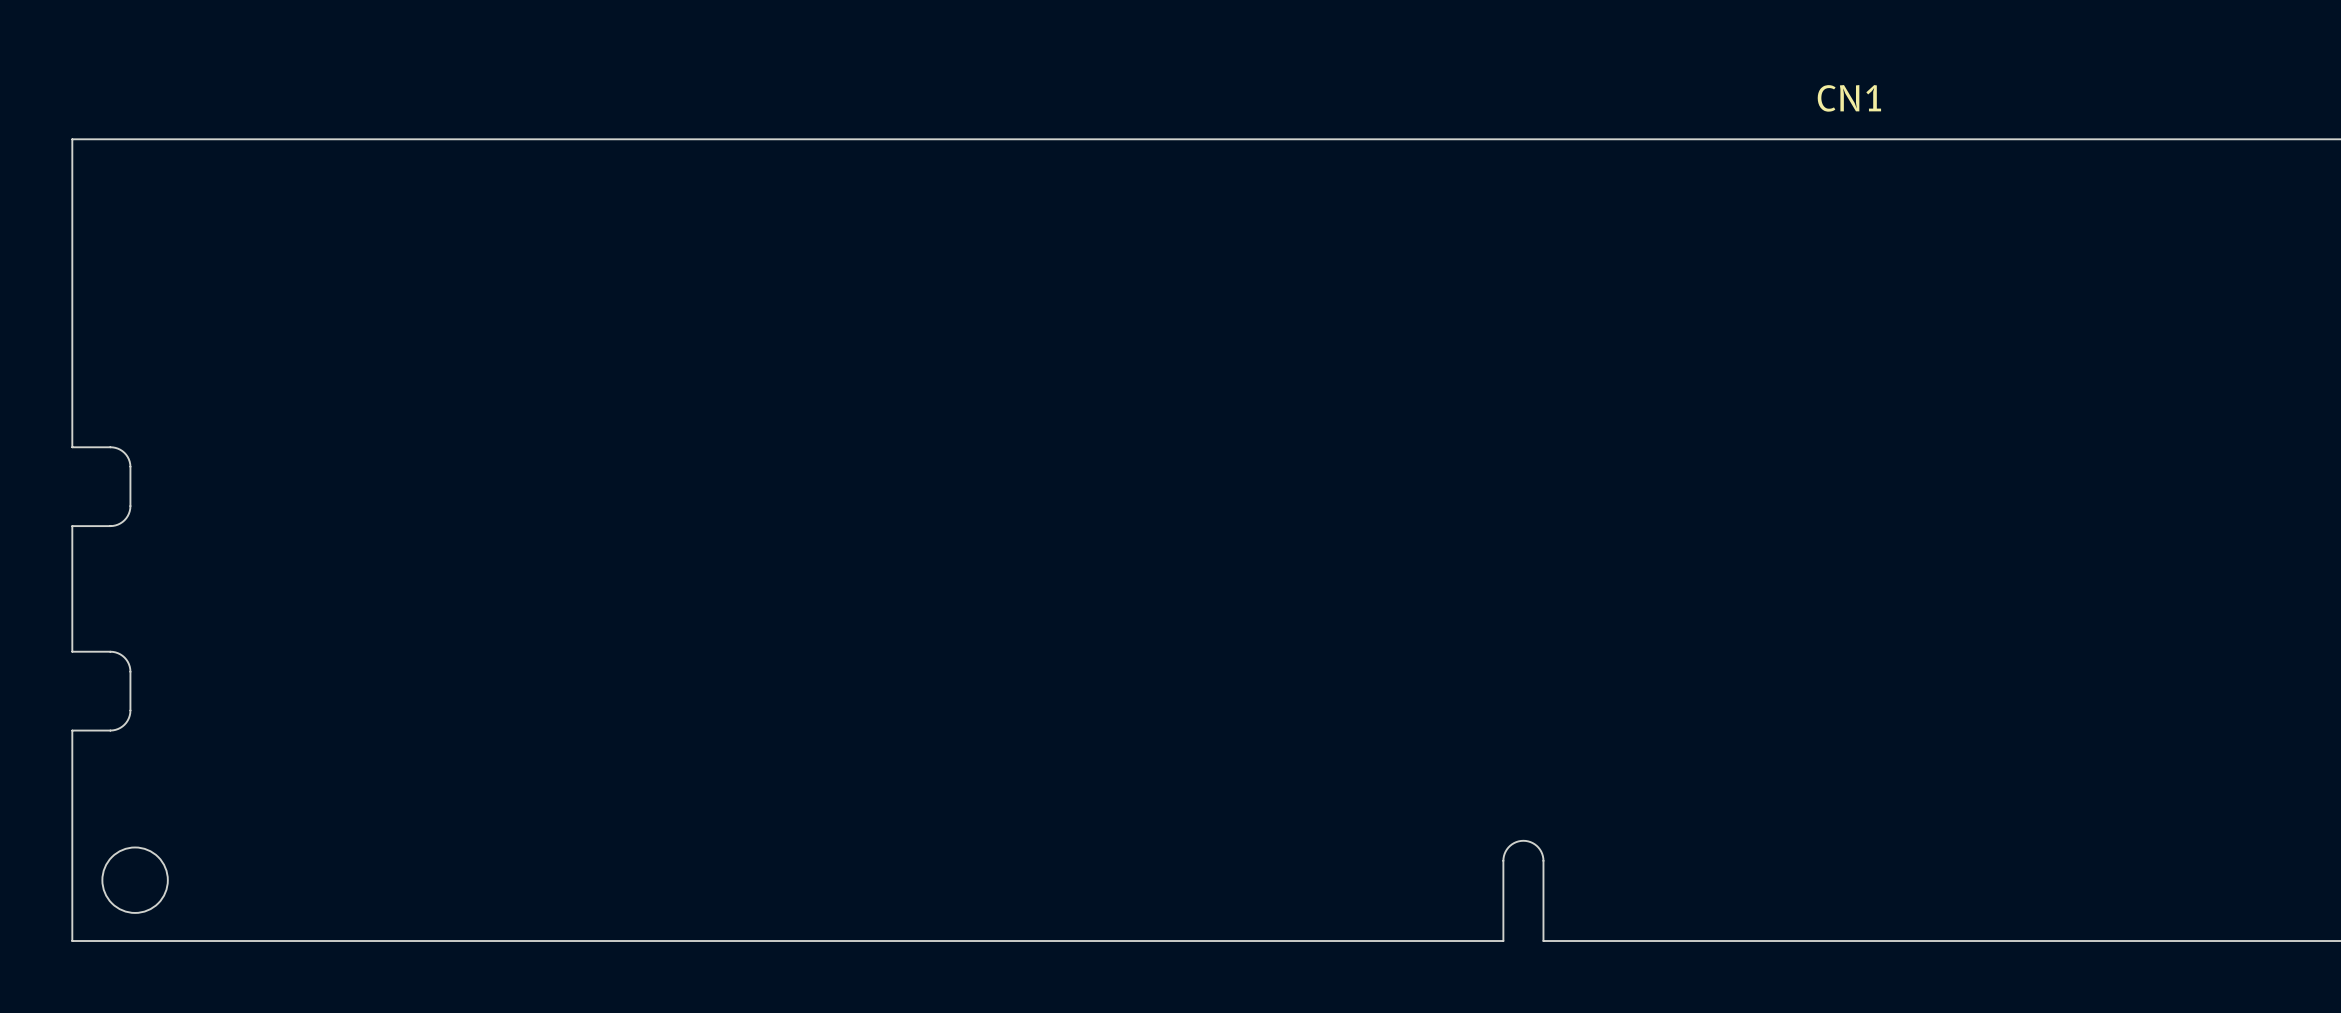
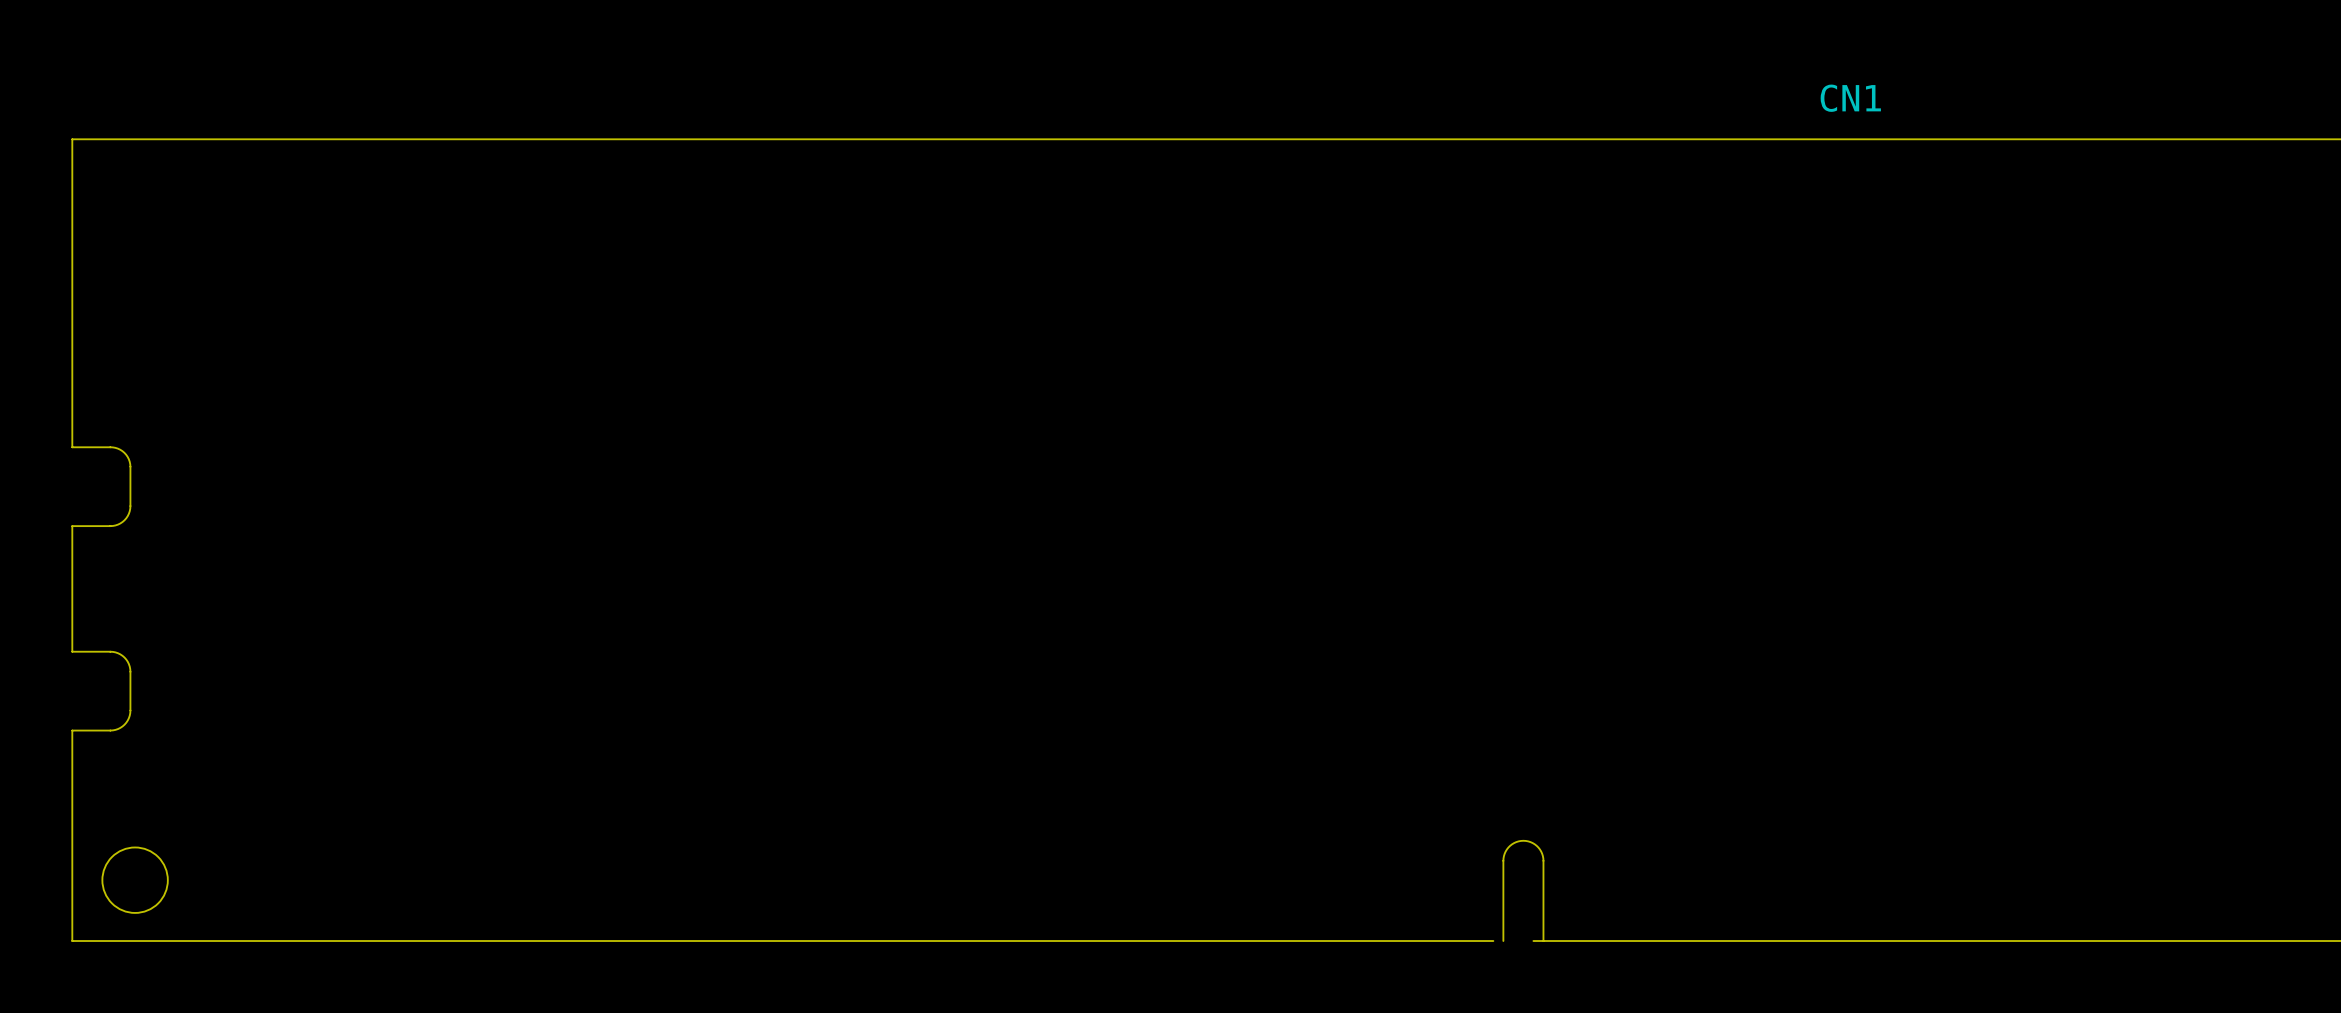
board edge: (1493, 941) (1503, 941) -> (1533, 941) (1543, 941)

